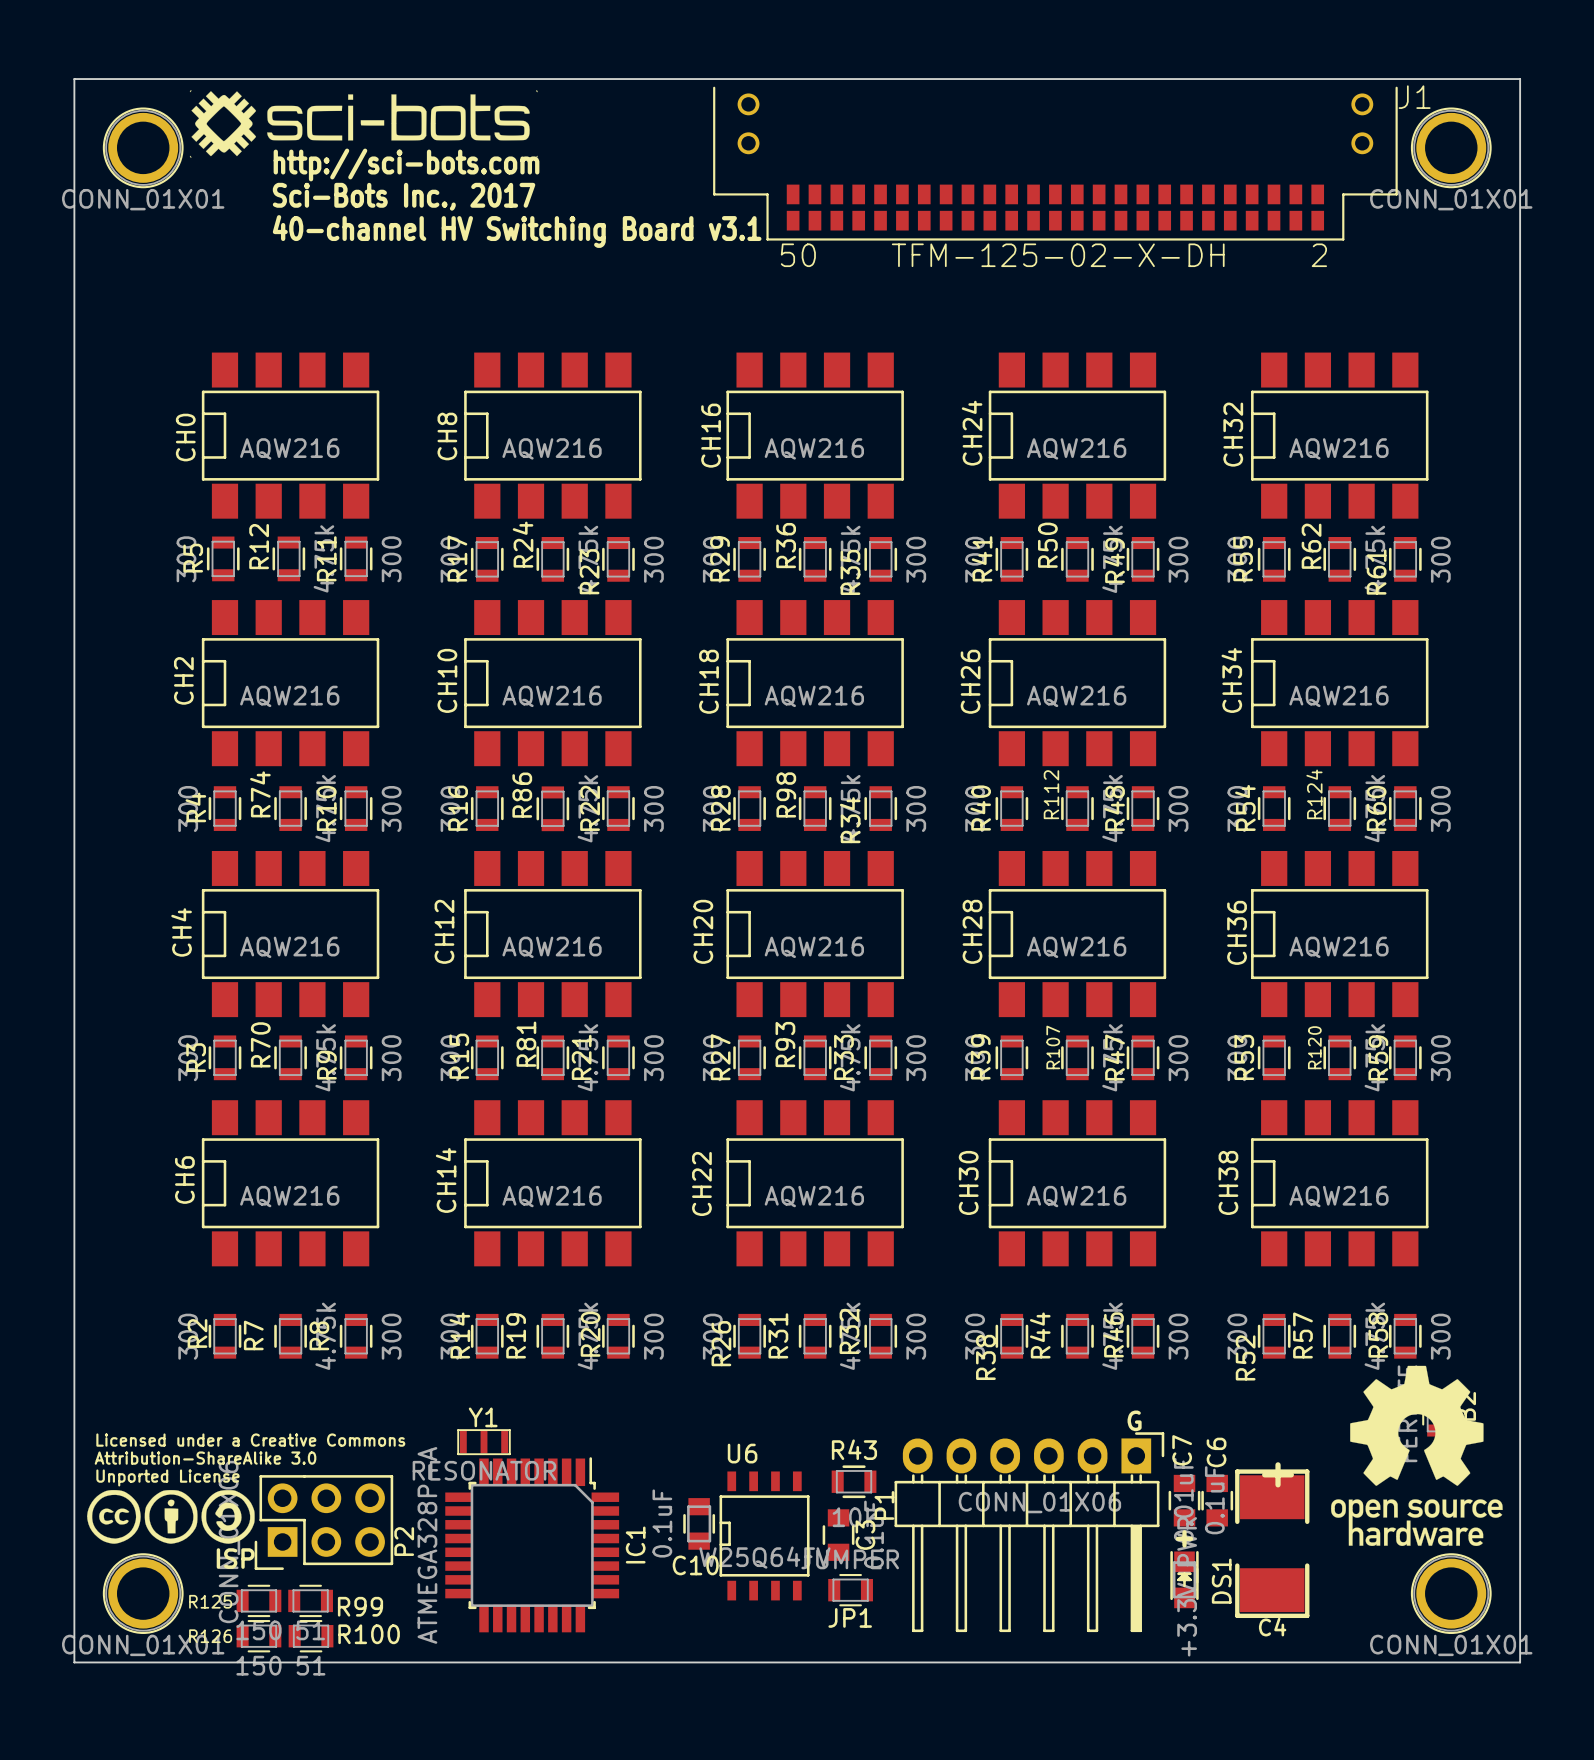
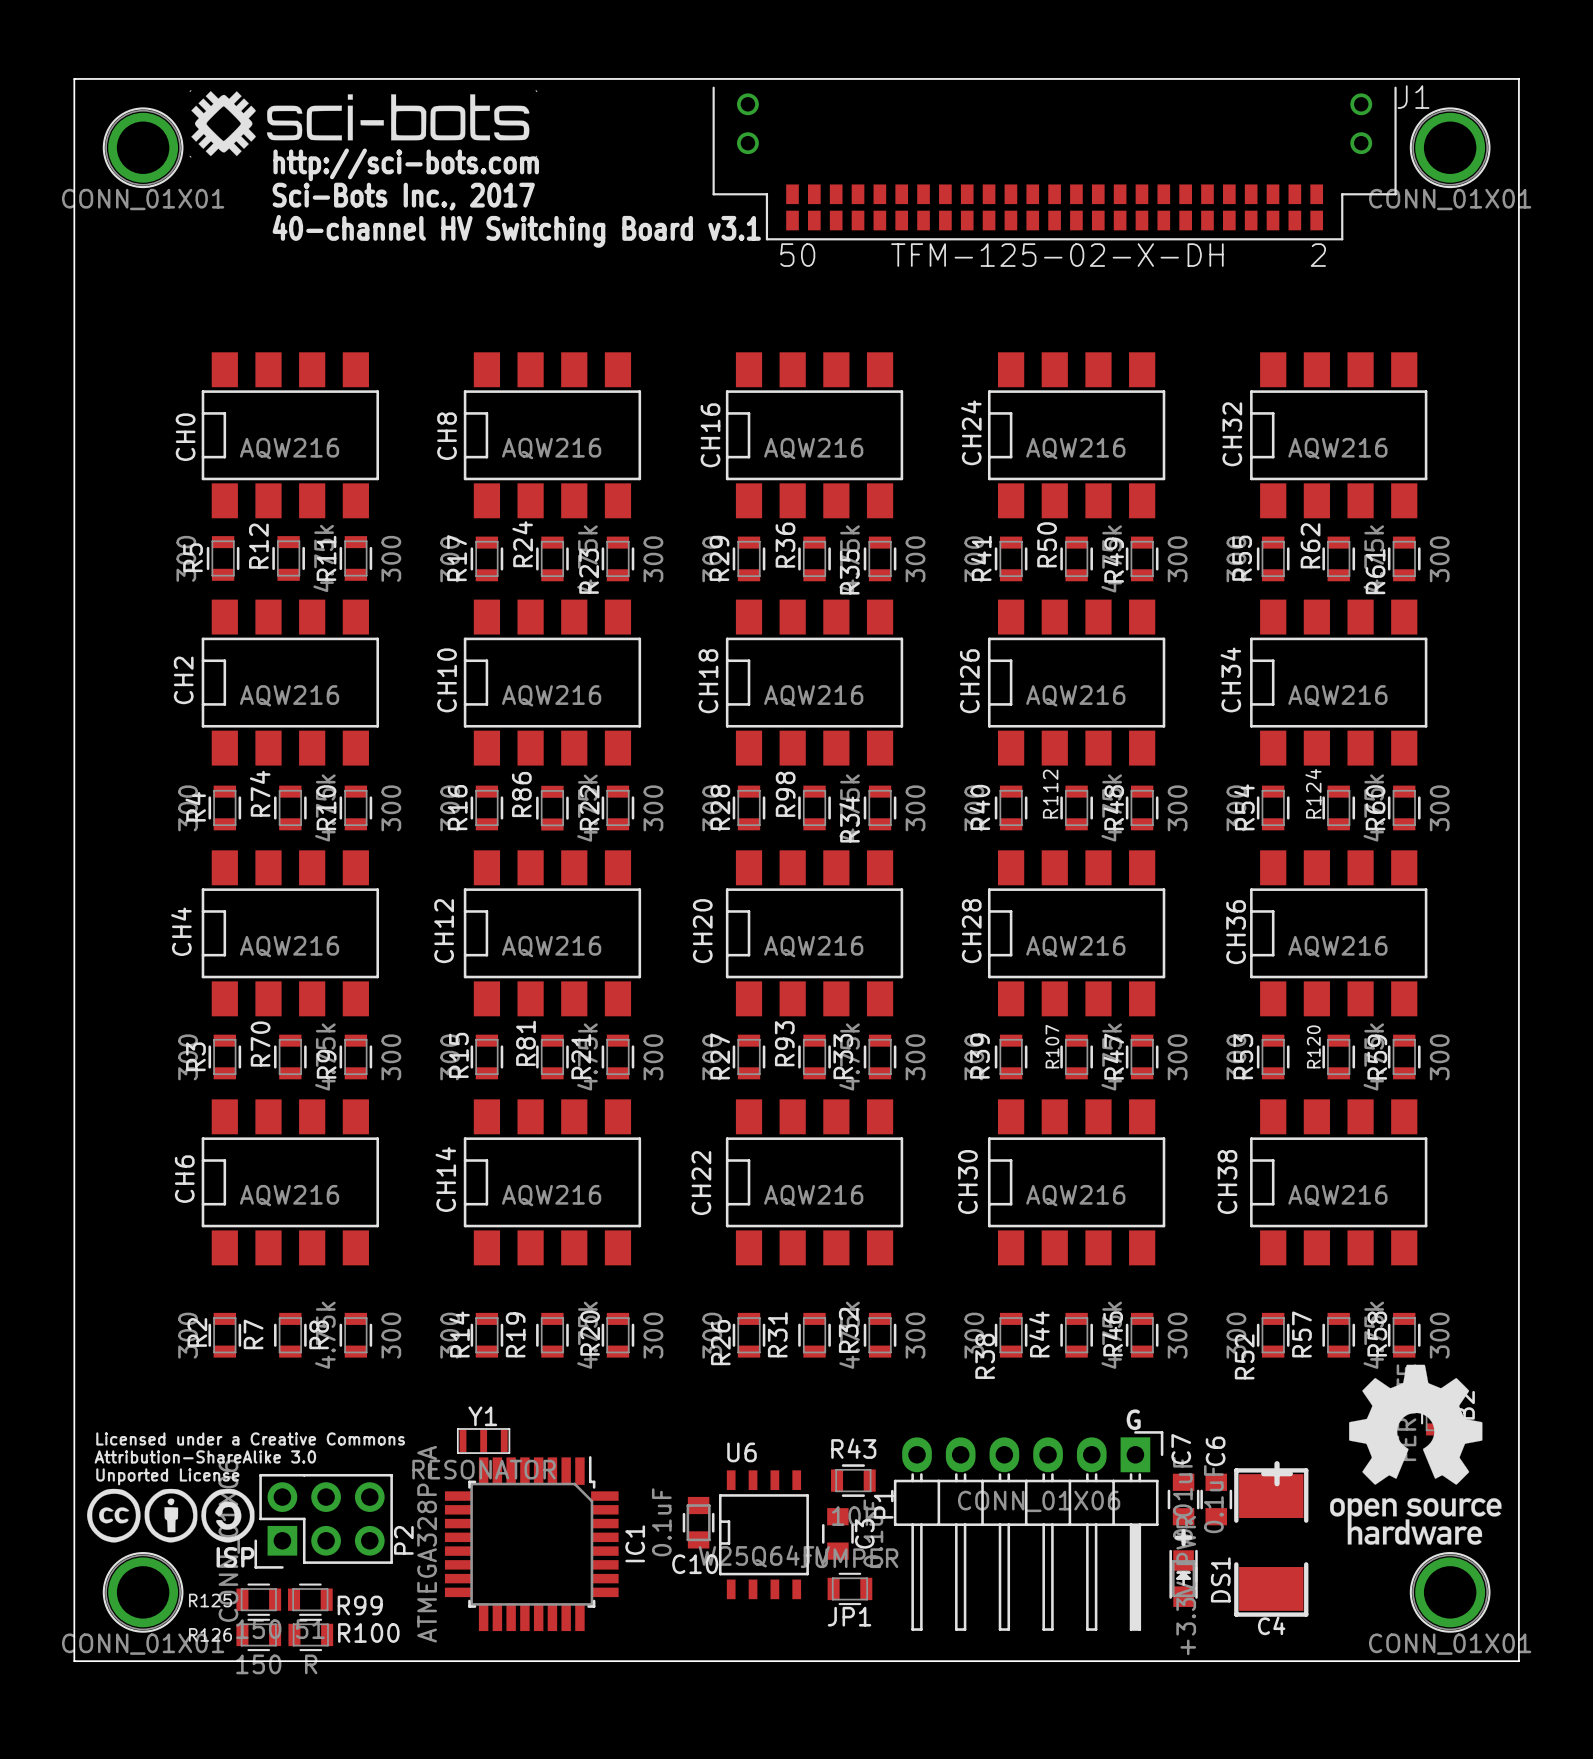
R100 value: 51 (311, 1665) -> R (311, 1664)

